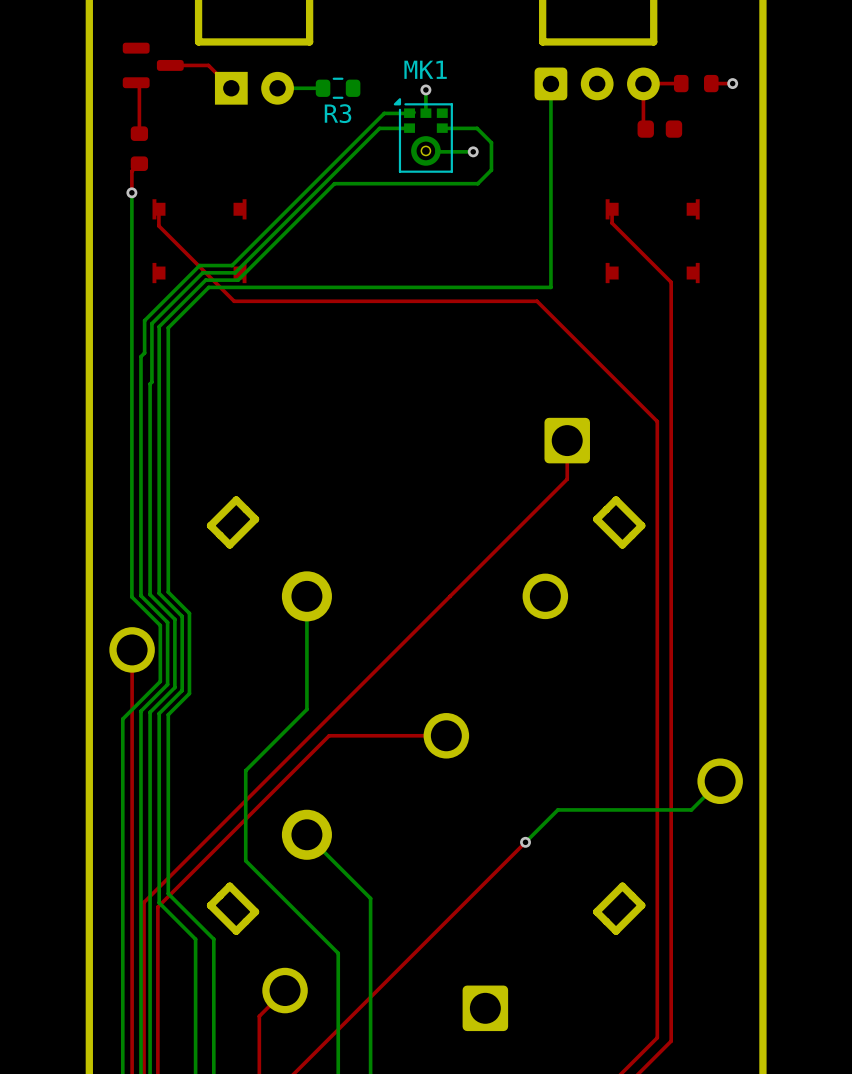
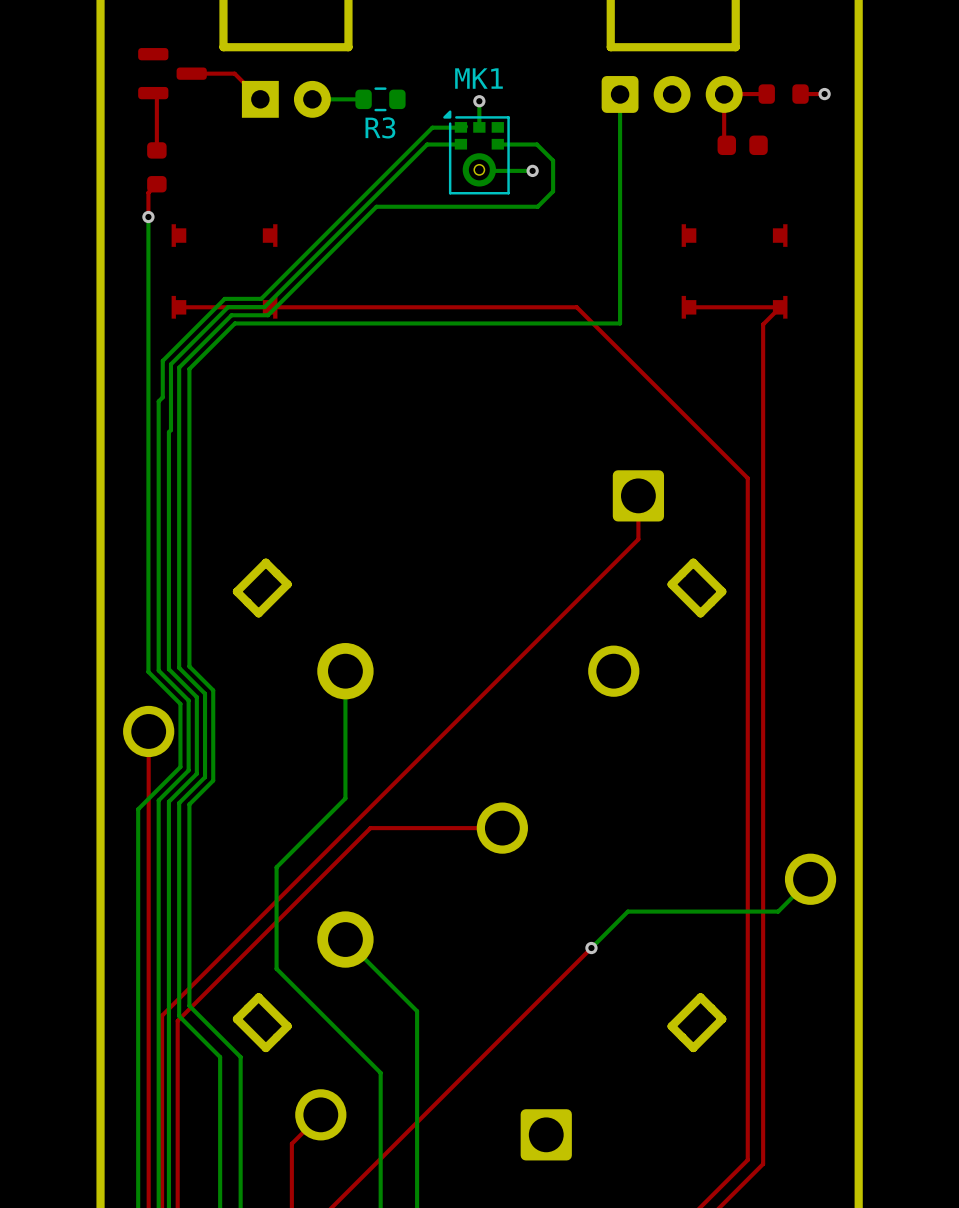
top track: (158, 209) (158, 225) (234, 301) (537, 301) (657, 421) (657, 1037) -> (178, 307) (576, 307) (747, 478) (747, 1160) (739, 1167)
top track: (612, 209) (612, 223) (671, 282) (671, 1041) -> (688, 307) (780, 307) (763, 324) (763, 1164) (755, 1171)

